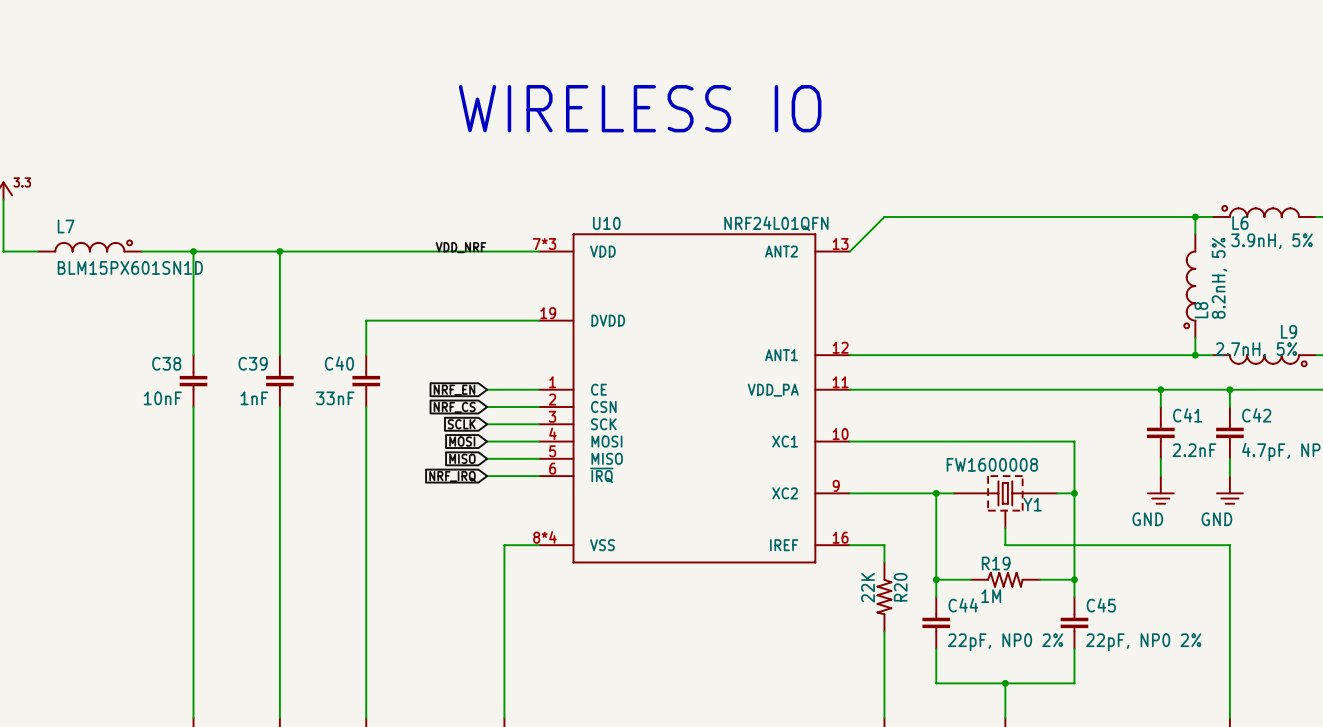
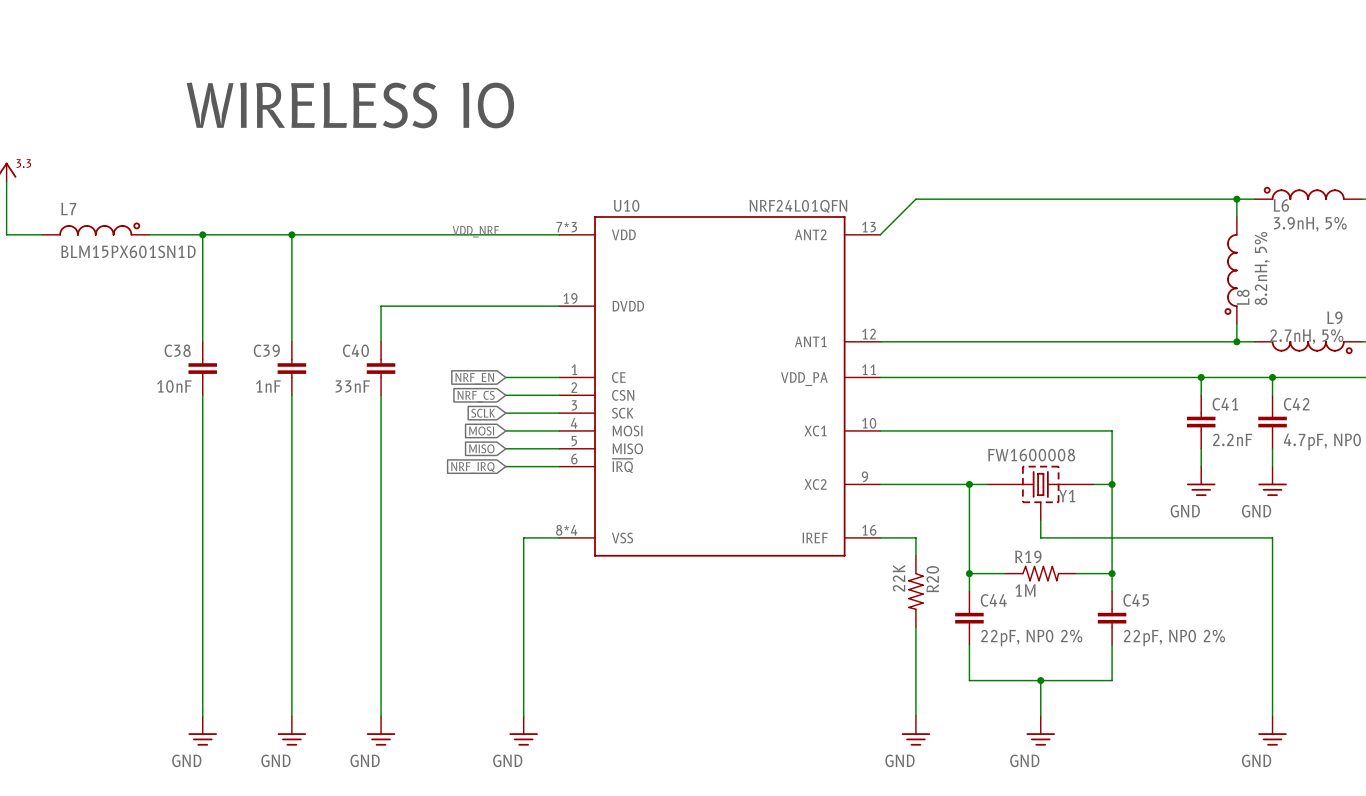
text: WIRELESS IO (640, 108) -> none
text: none -> WIRELESS IO (350, 105)

